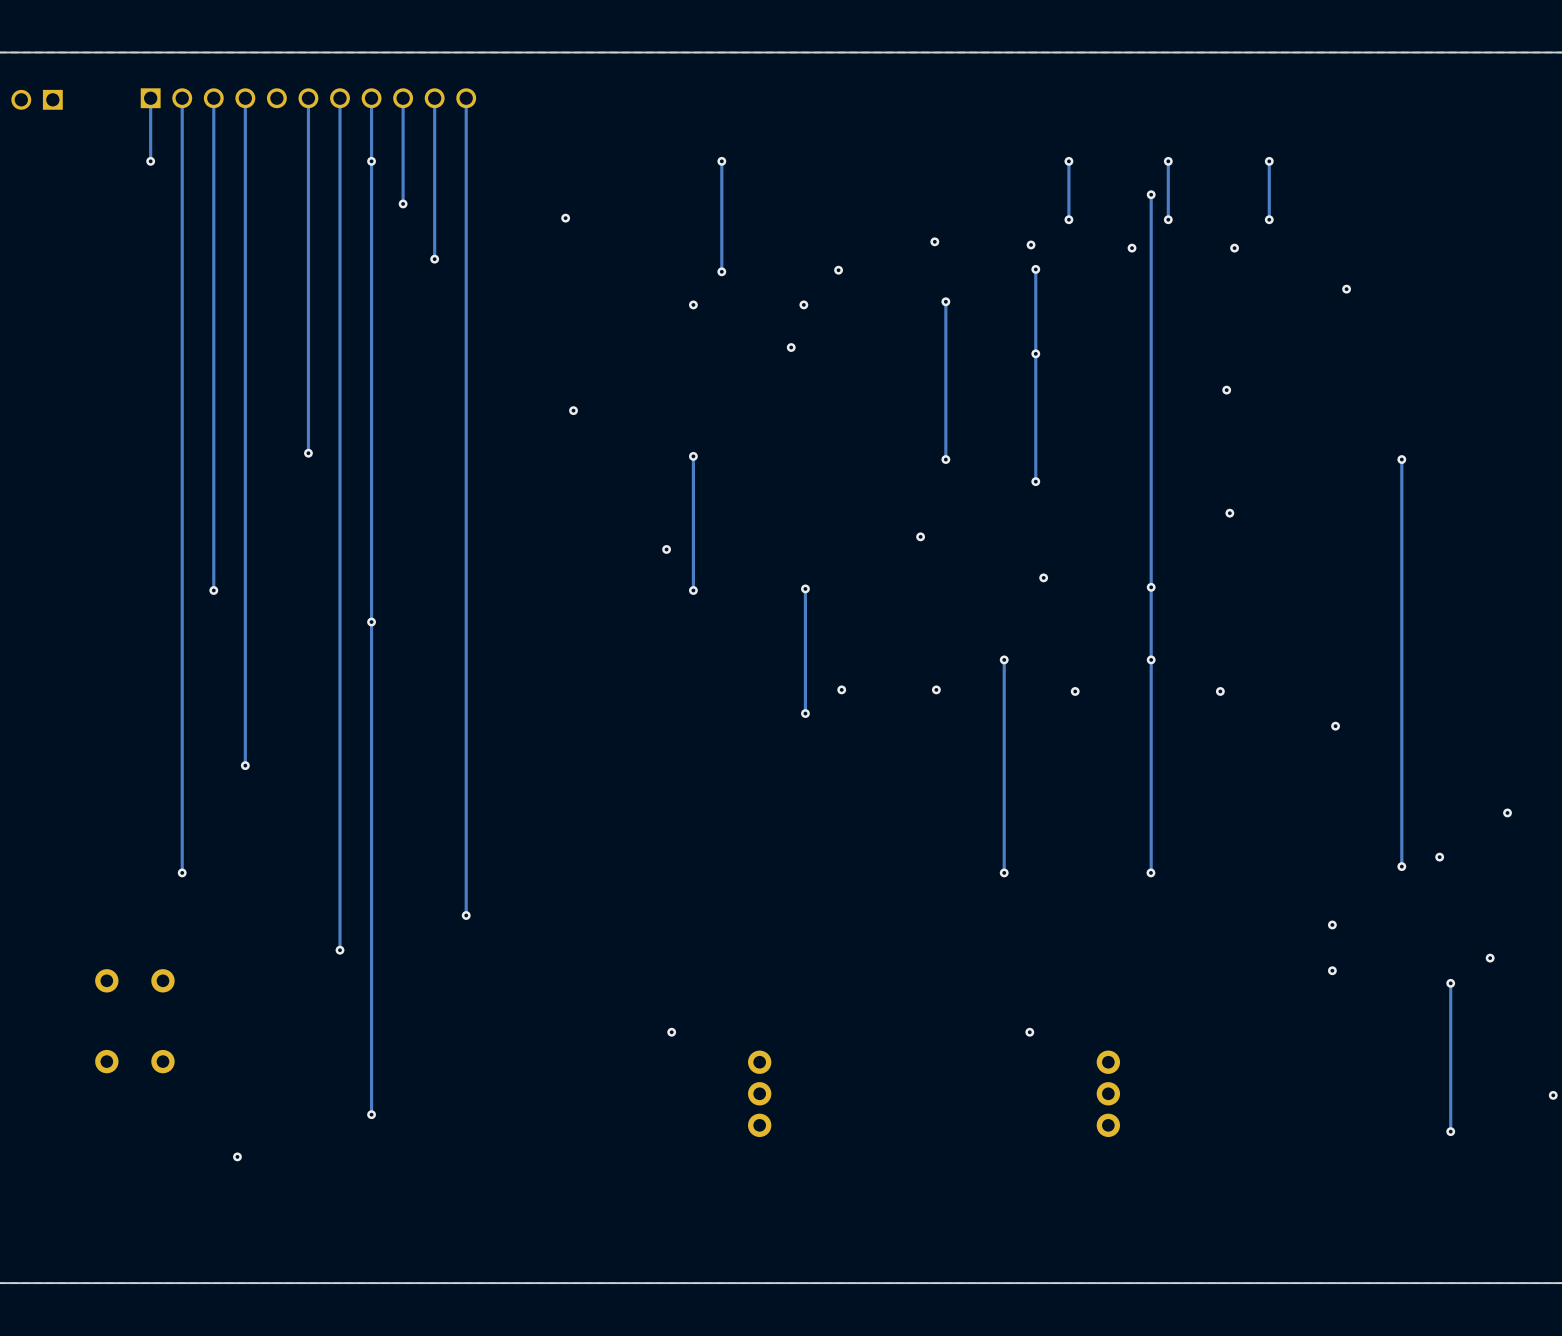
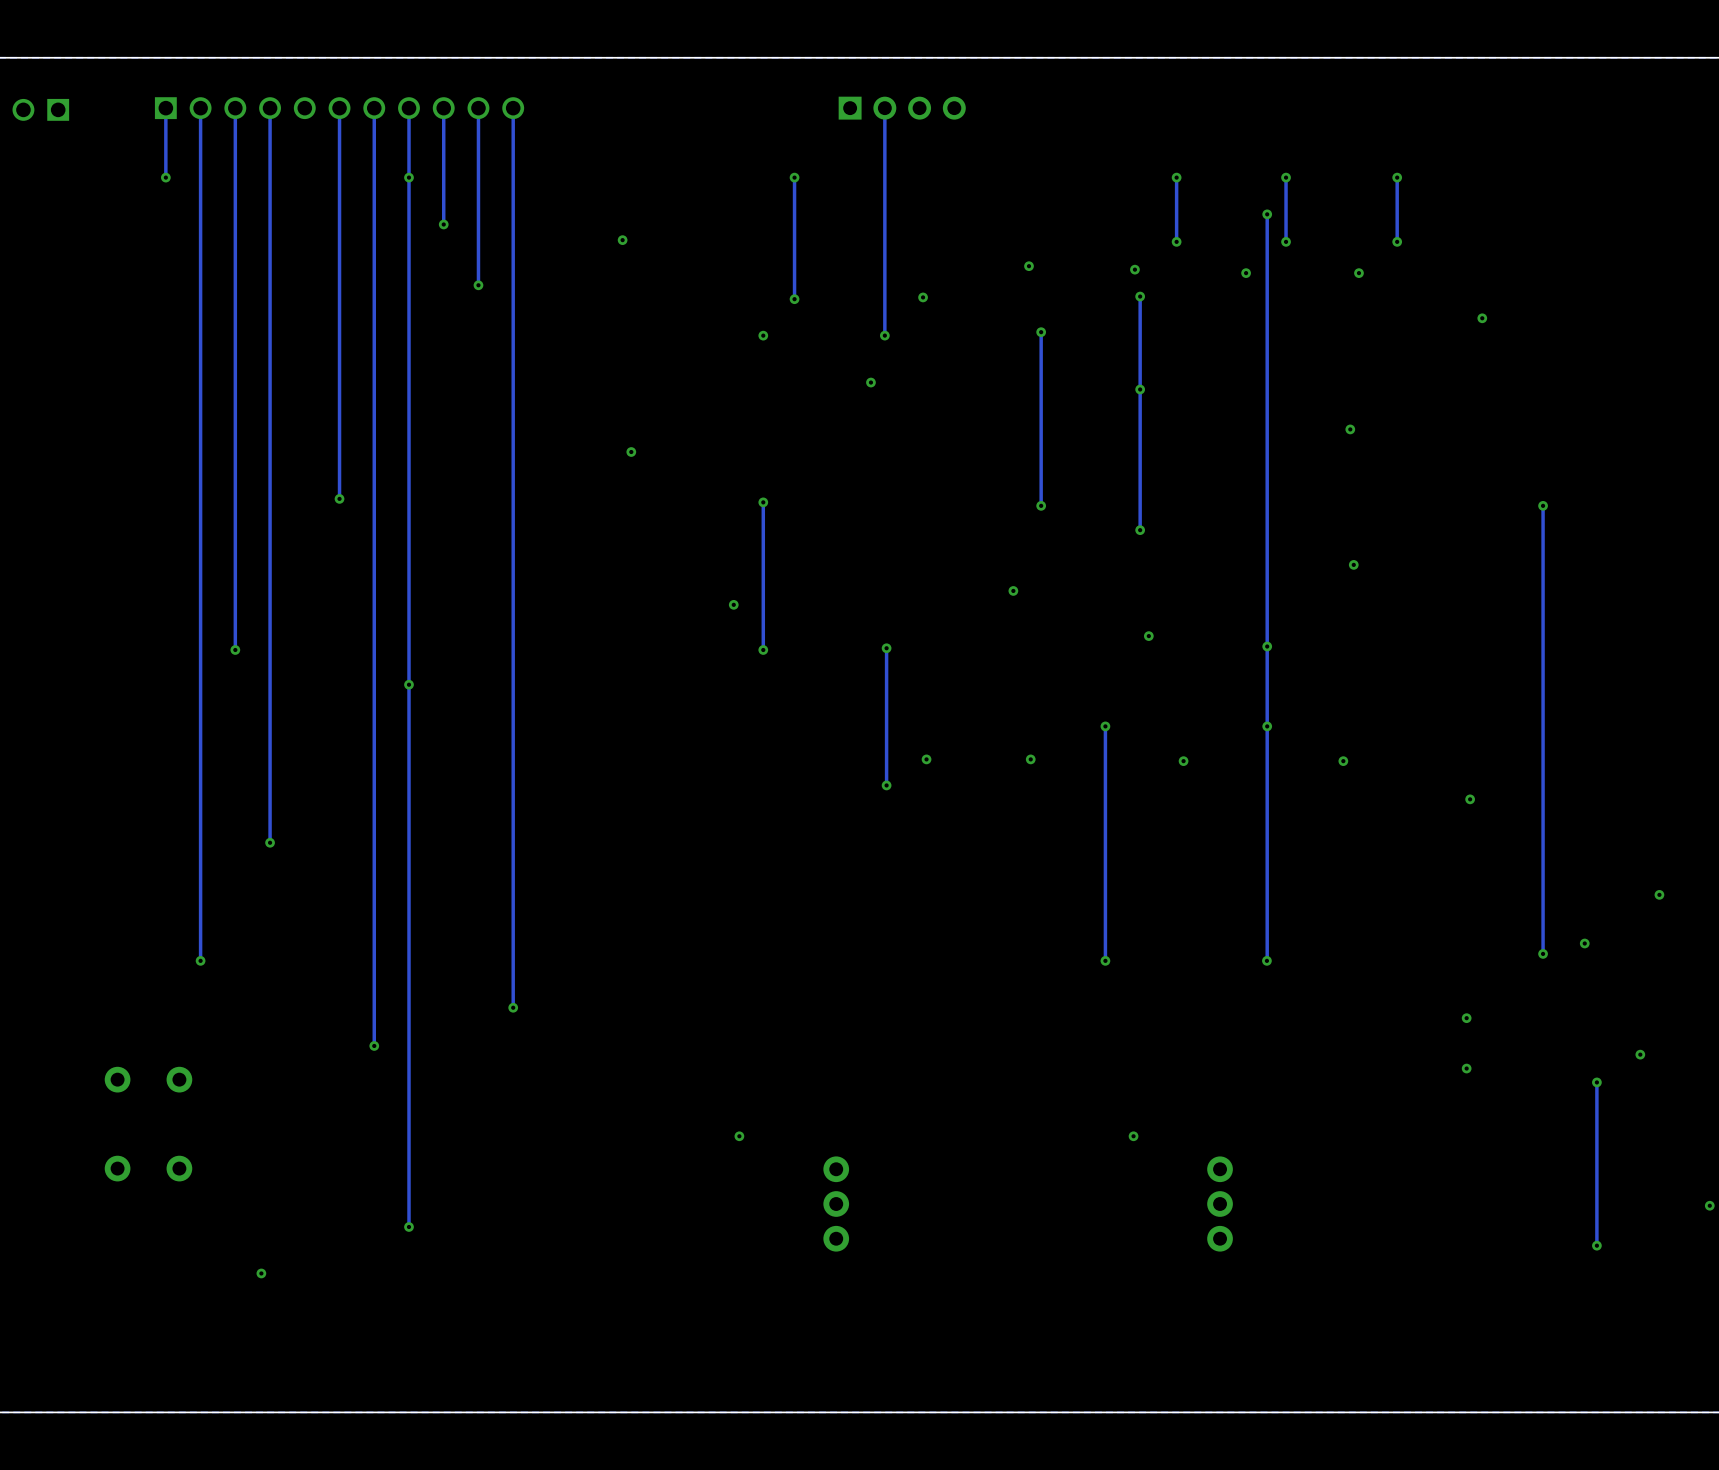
track: none -> (884, 108) (884, 335)
part: none -> (902, 108)

